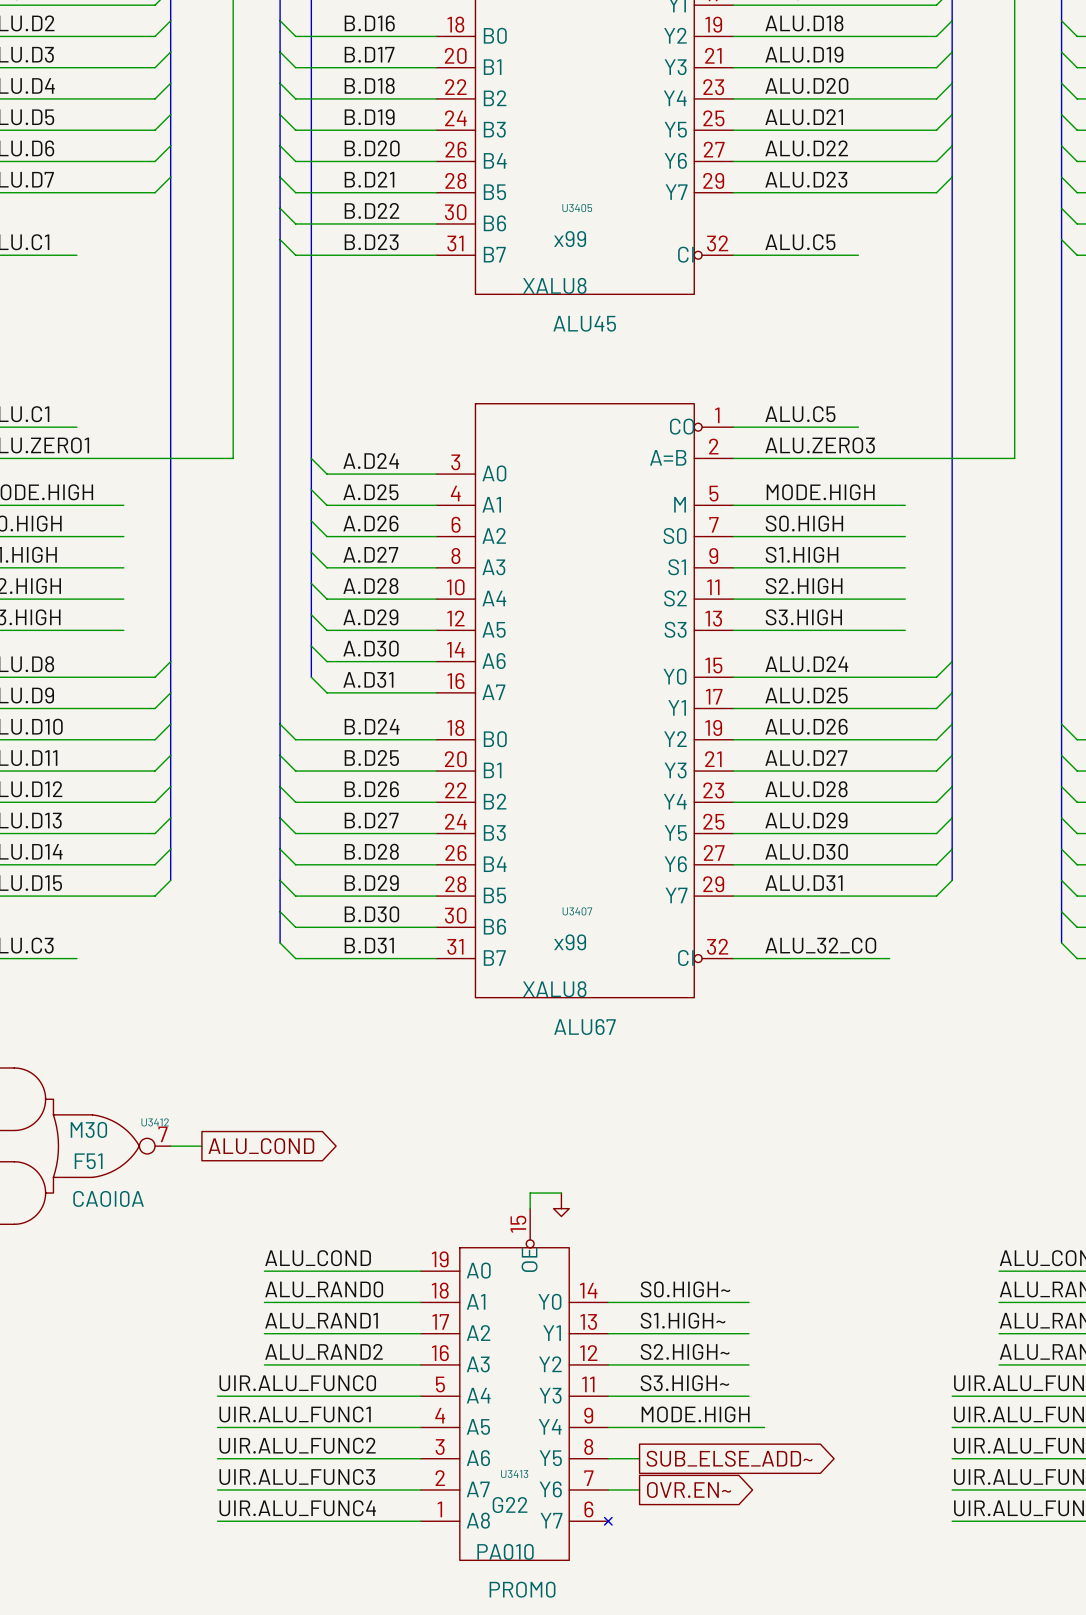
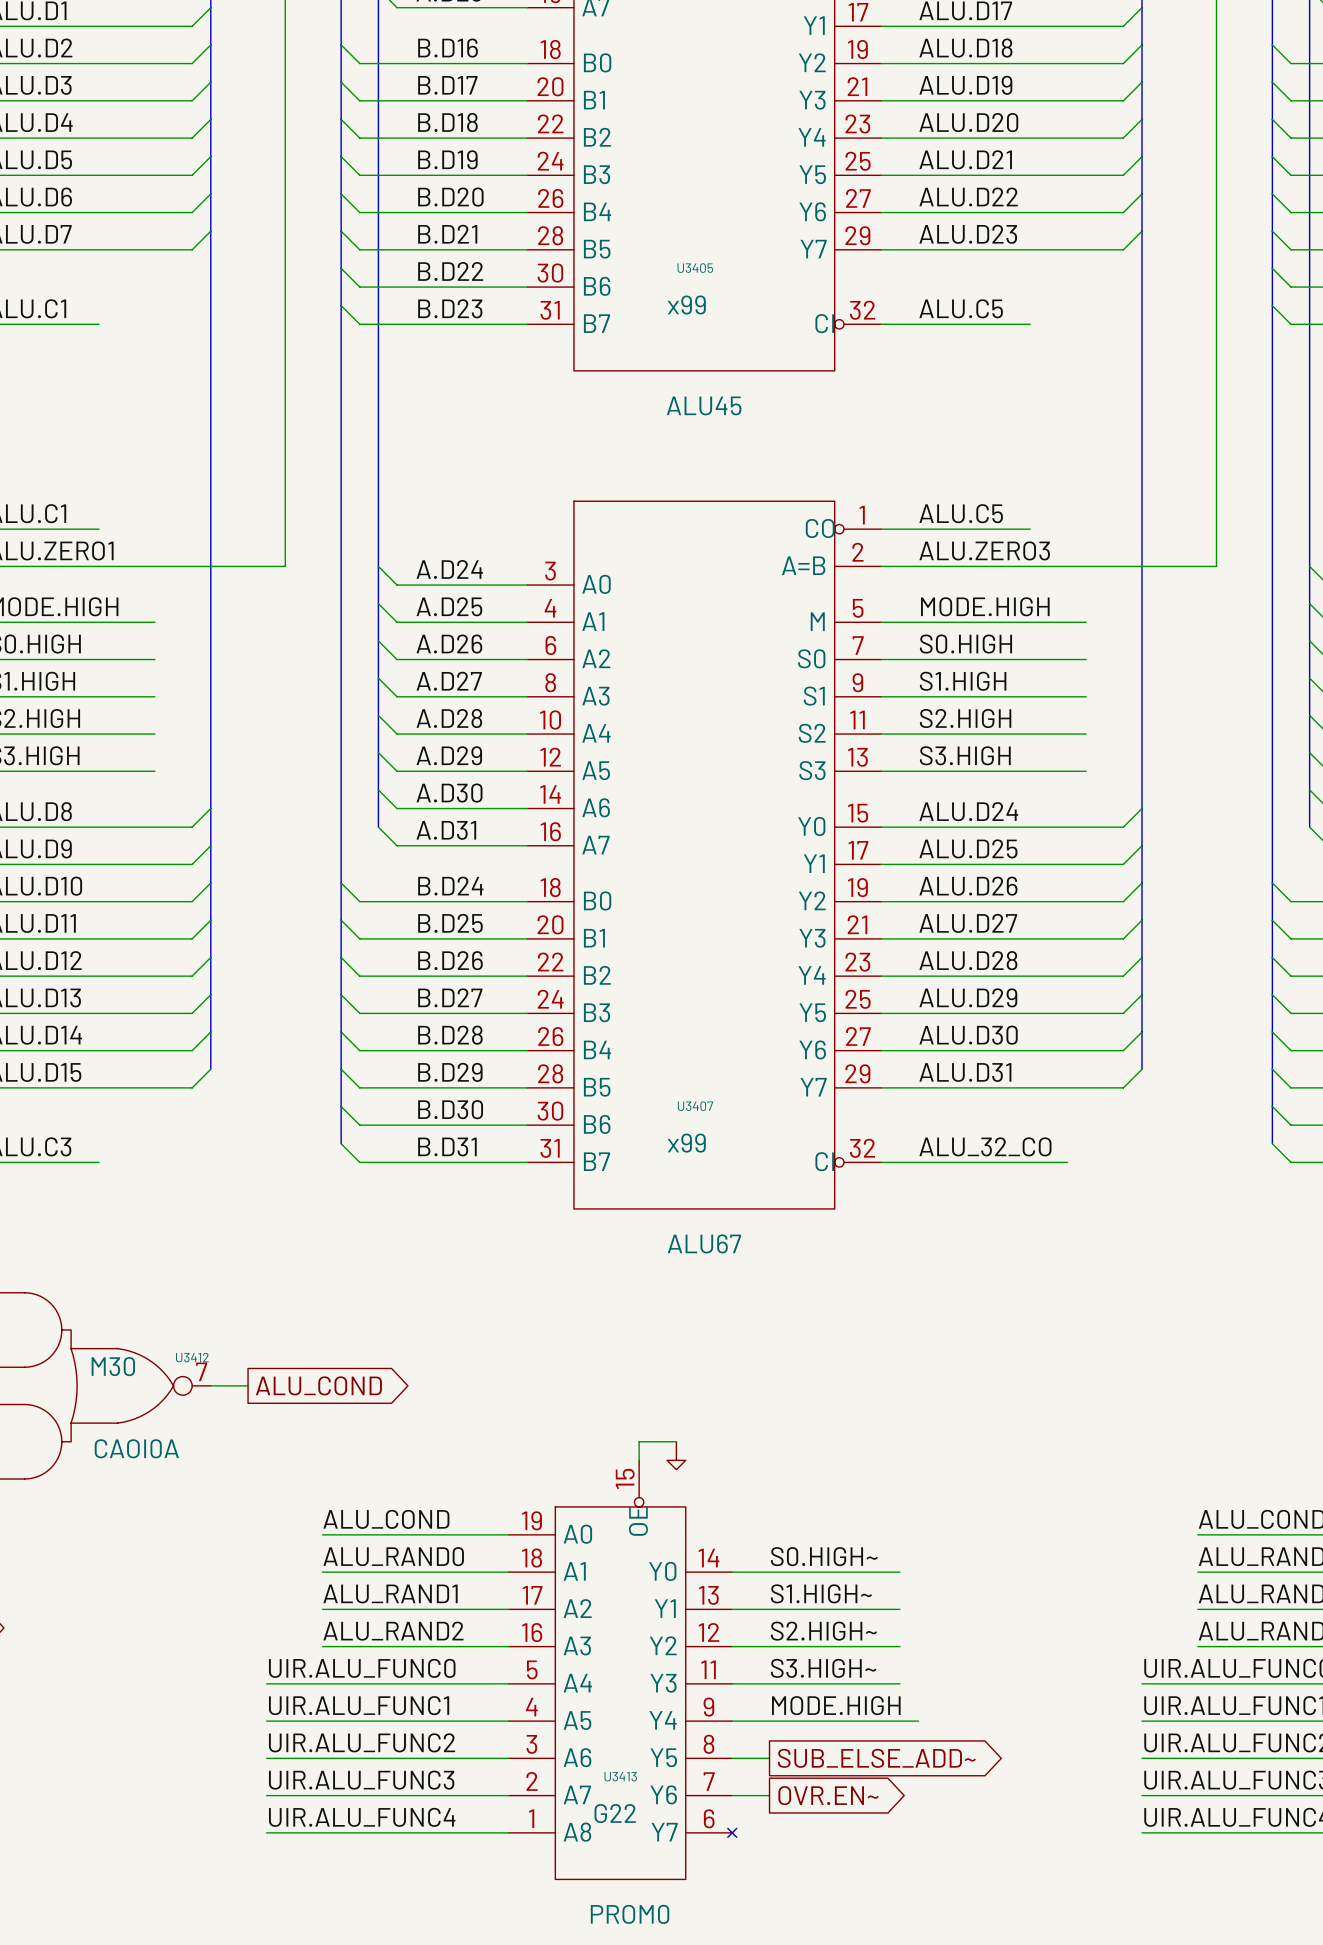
U3405 value: XALU8 (554, 285) -> none
U3407 value: XALU8 (554, 989) -> none
U3412 value: F51 (88, 1161) -> none
U3413 value: PA010 (505, 1551) -> none

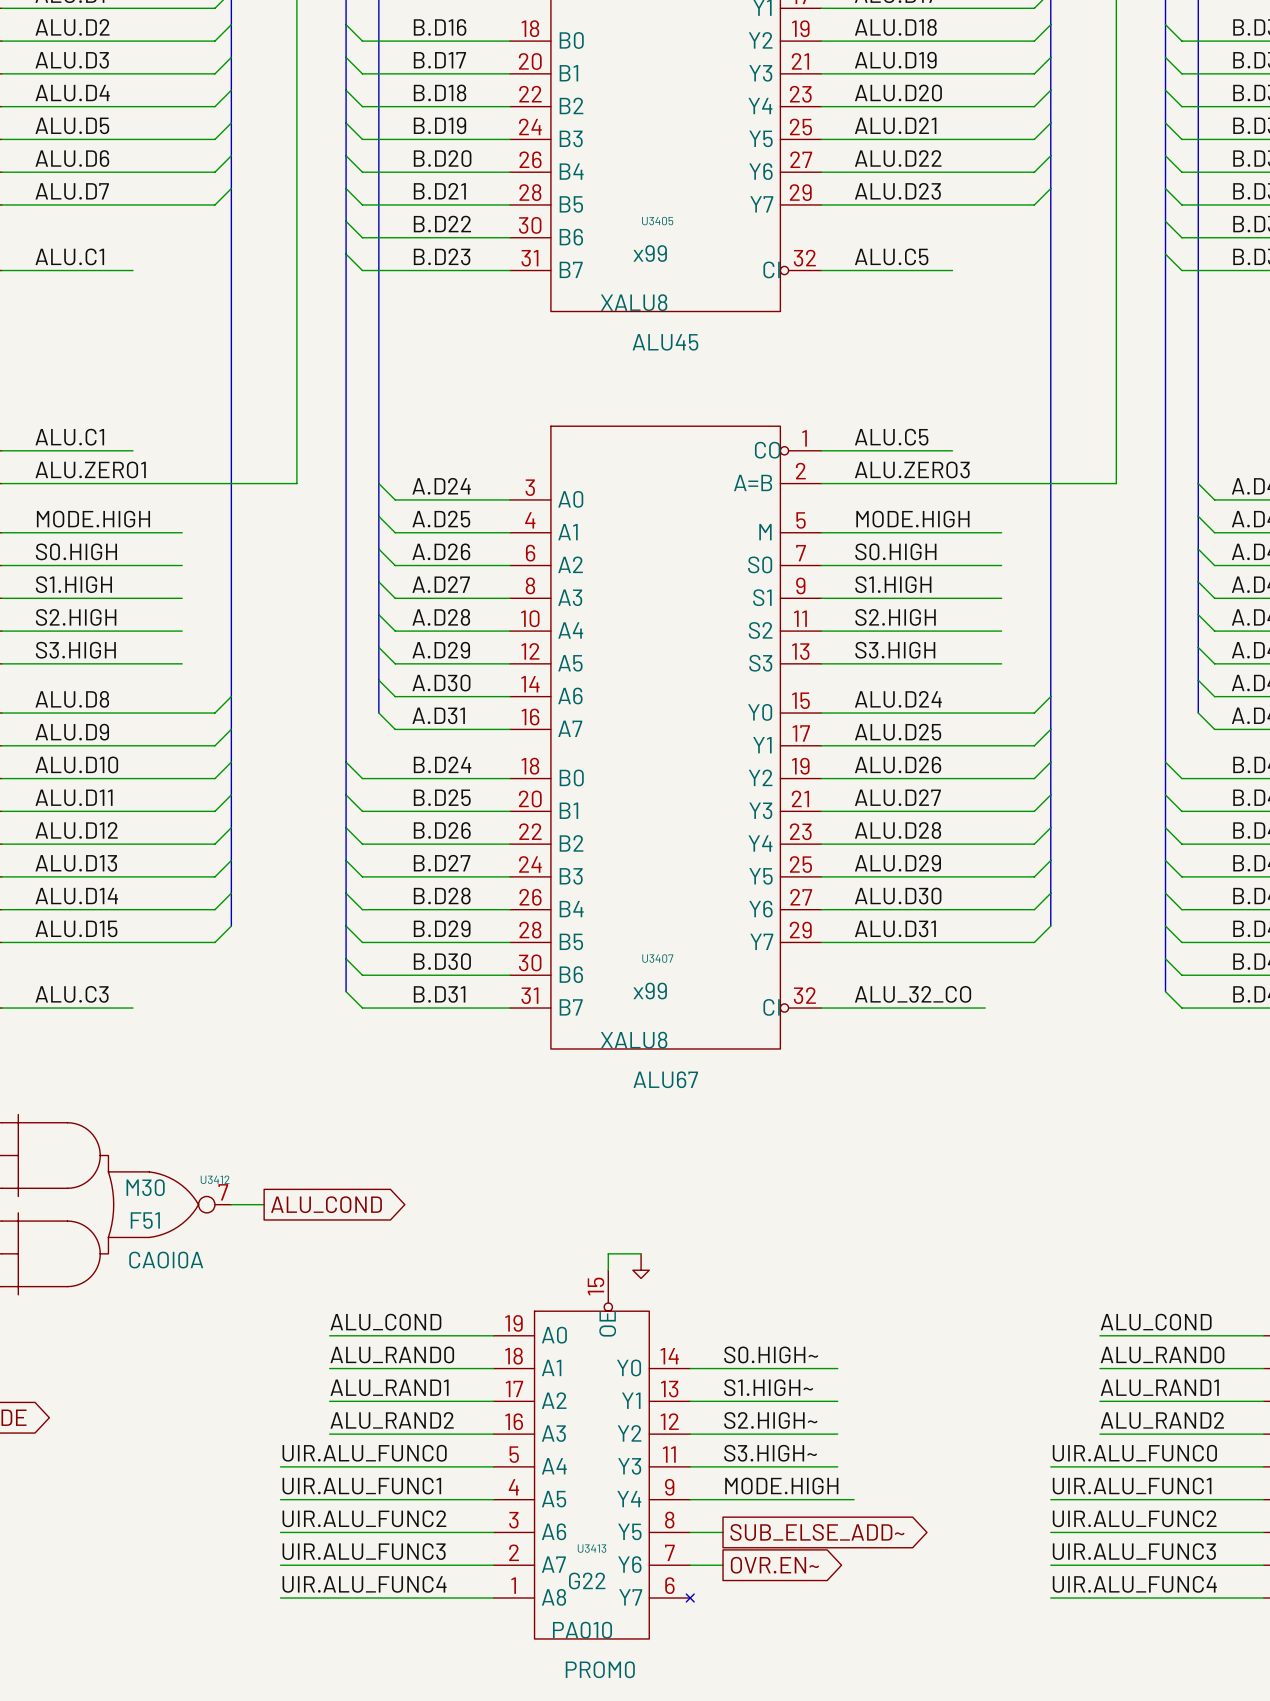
U3405 value: none -> XALU8 (634, 302)
U3407 value: none -> XALU8 (634, 1040)
U3412 value: none -> F51 (145, 1220)
U3413 value: none -> PA010 (582, 1630)

